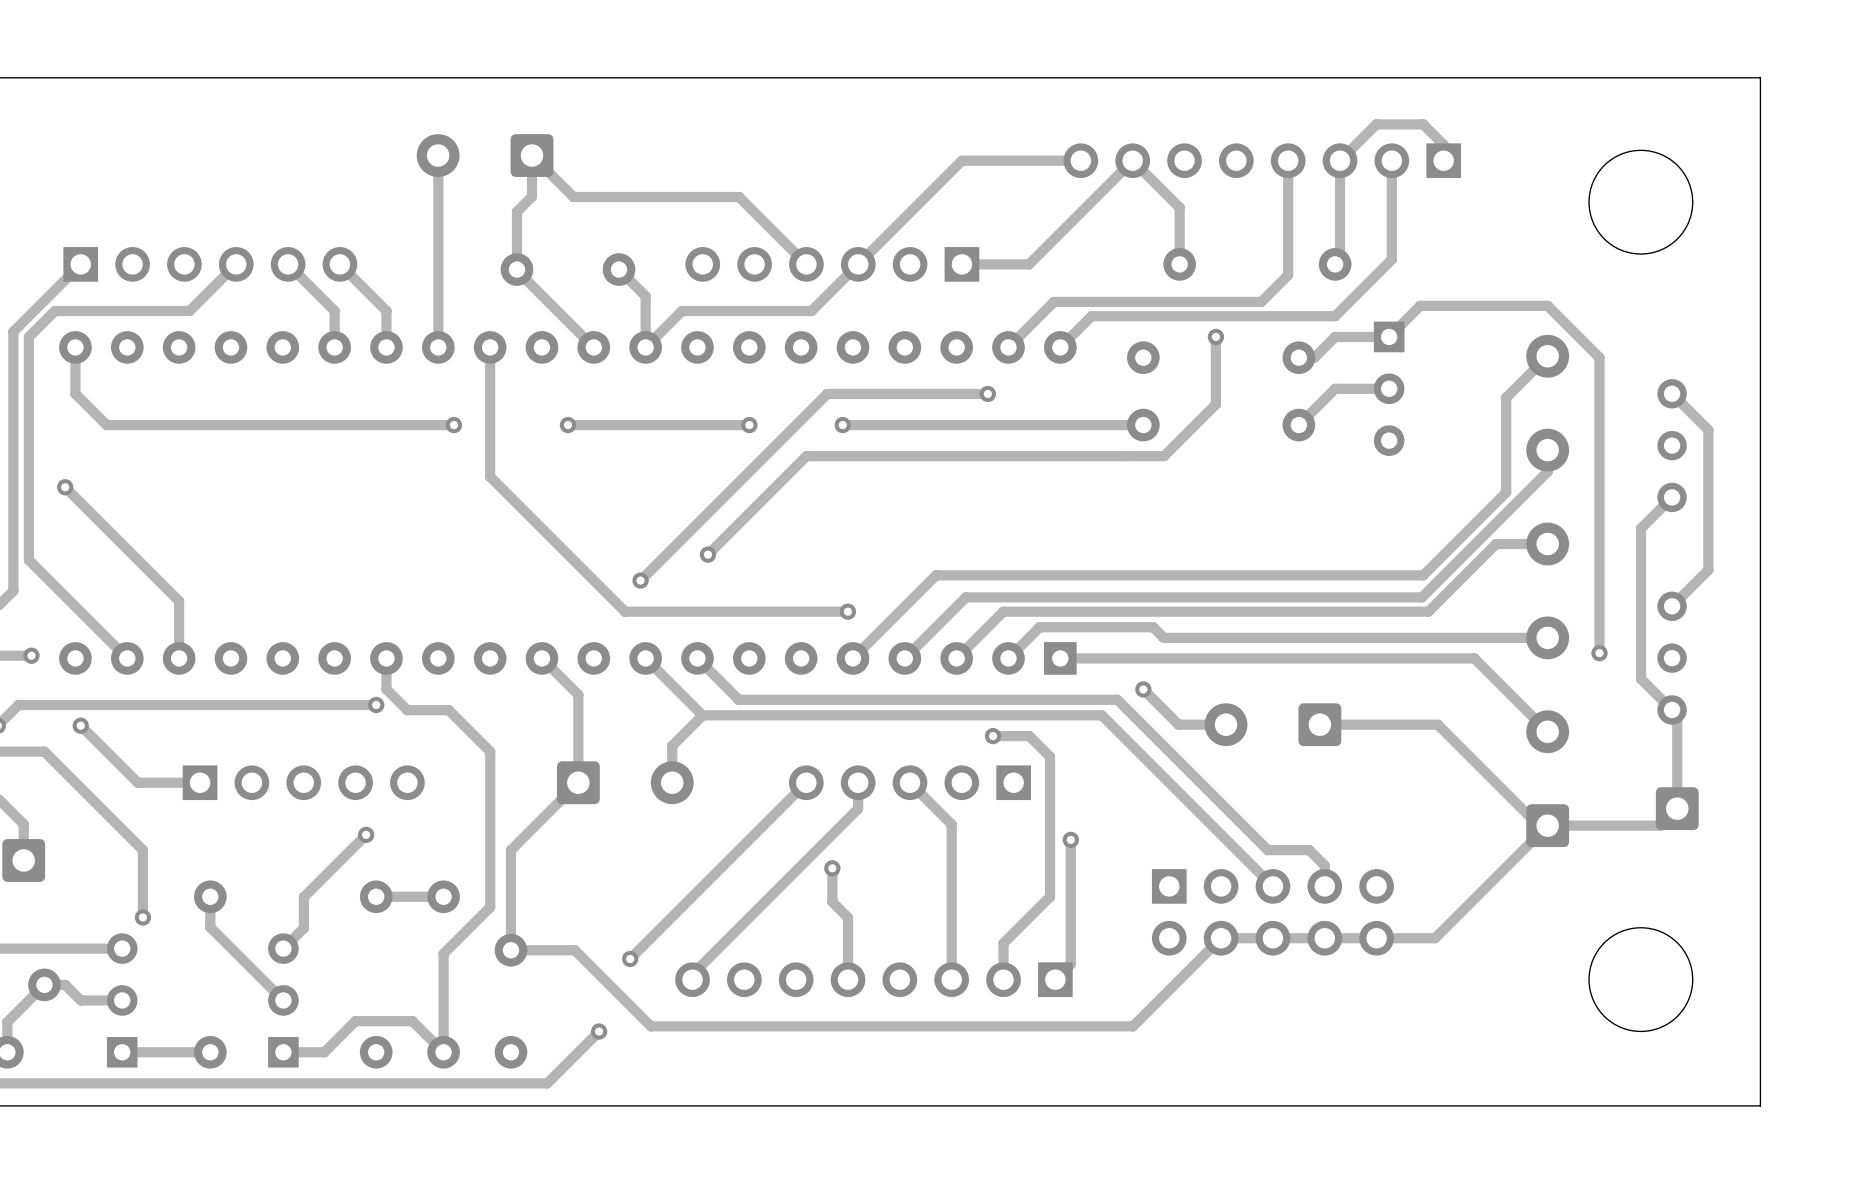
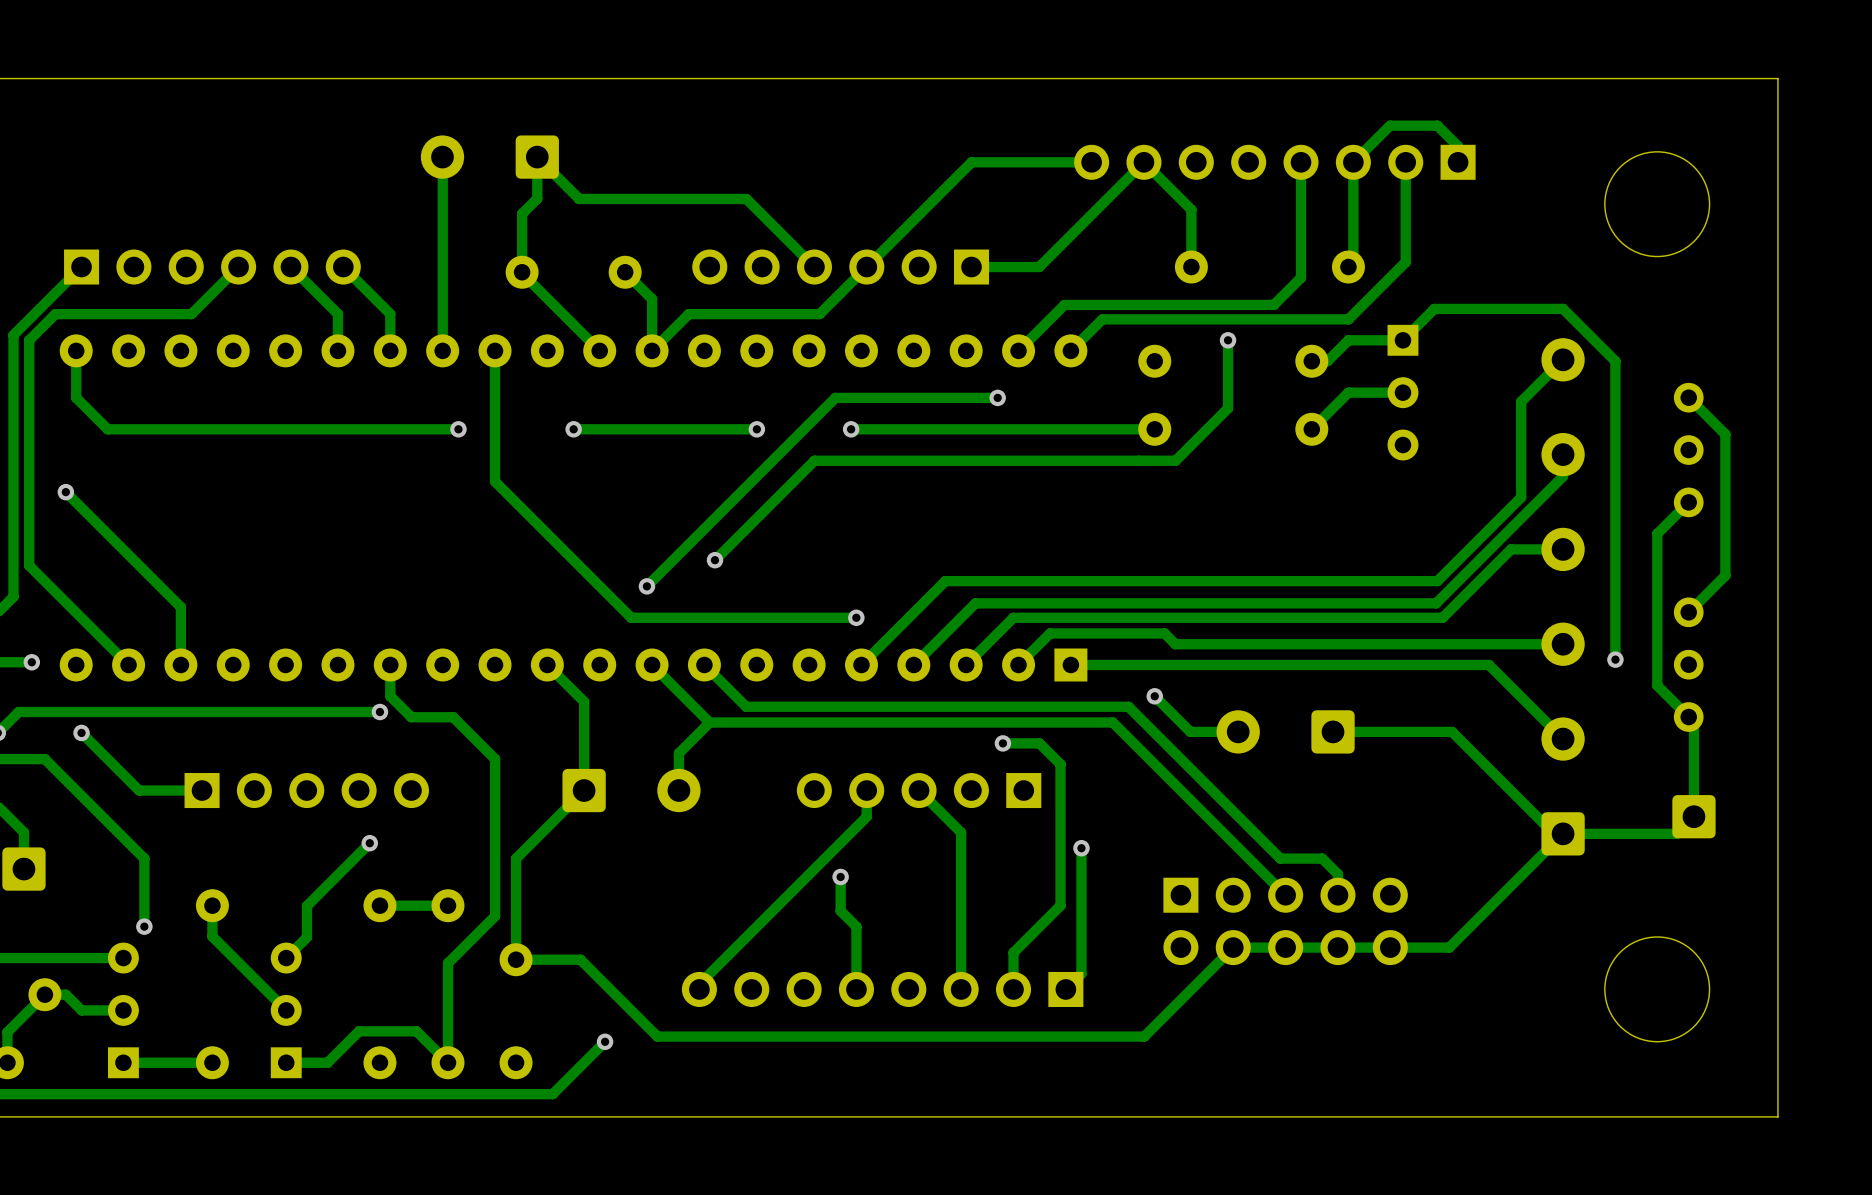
track: (806, 782) (630, 958) -> none
via: (630, 958) -> none

